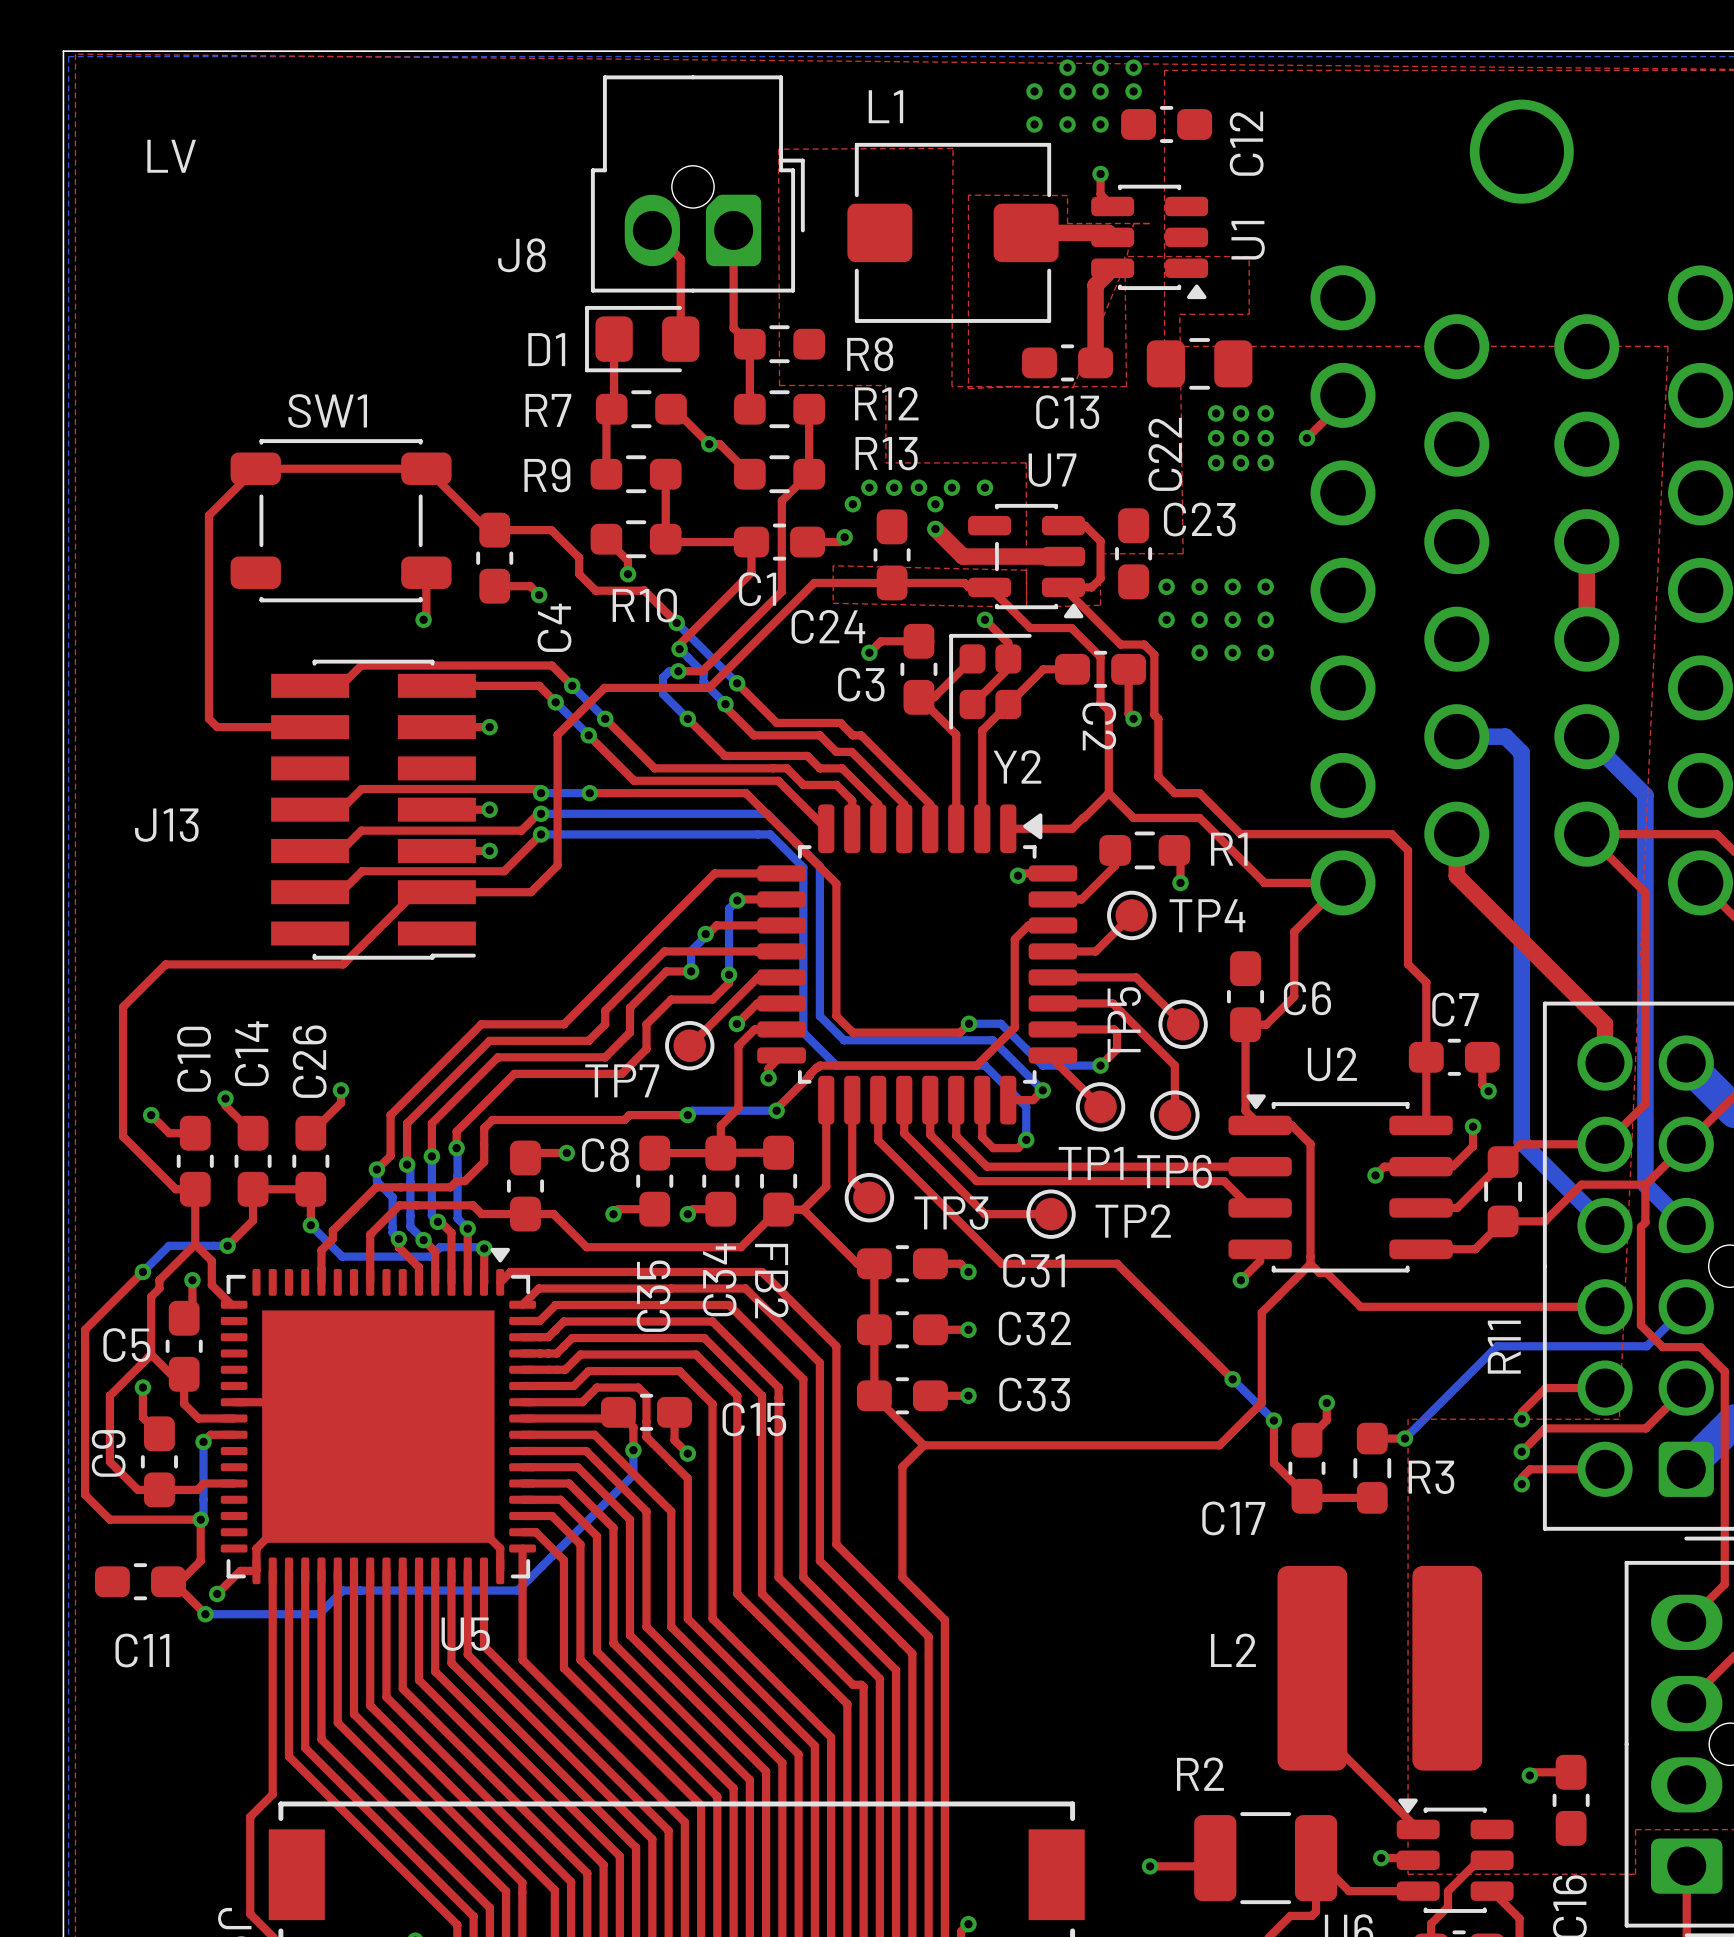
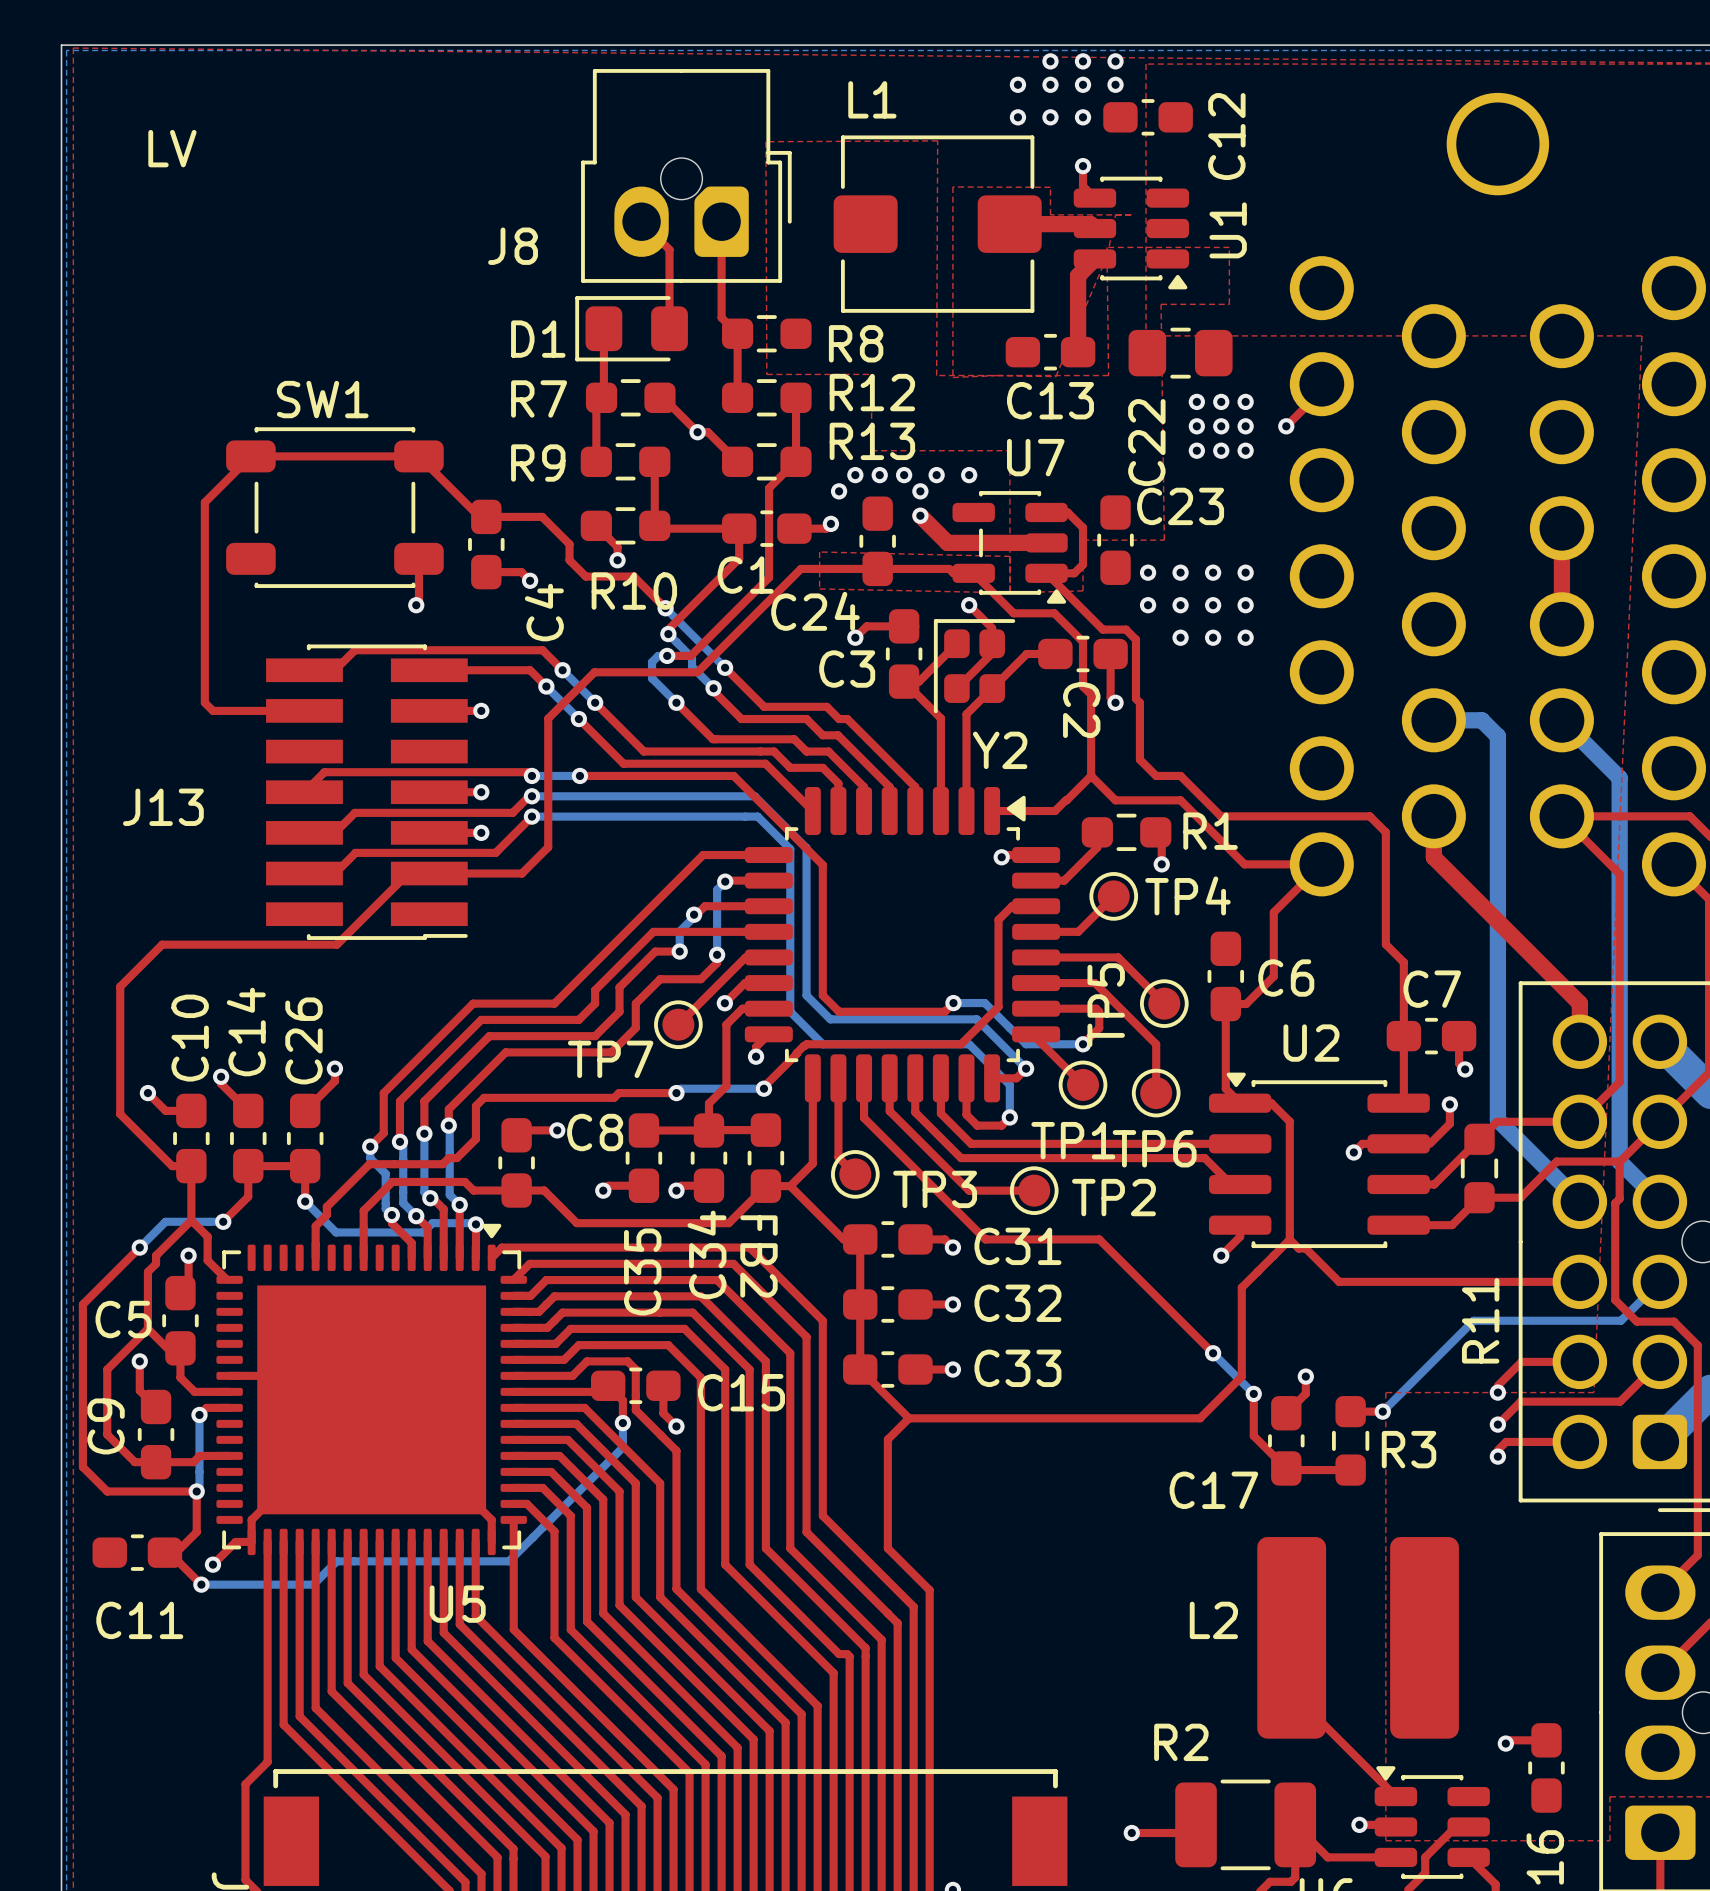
top track: (536, 789) (361, 789) (341, 809) (310, 809) -> (528, 772) (324, 772) (304, 792)

